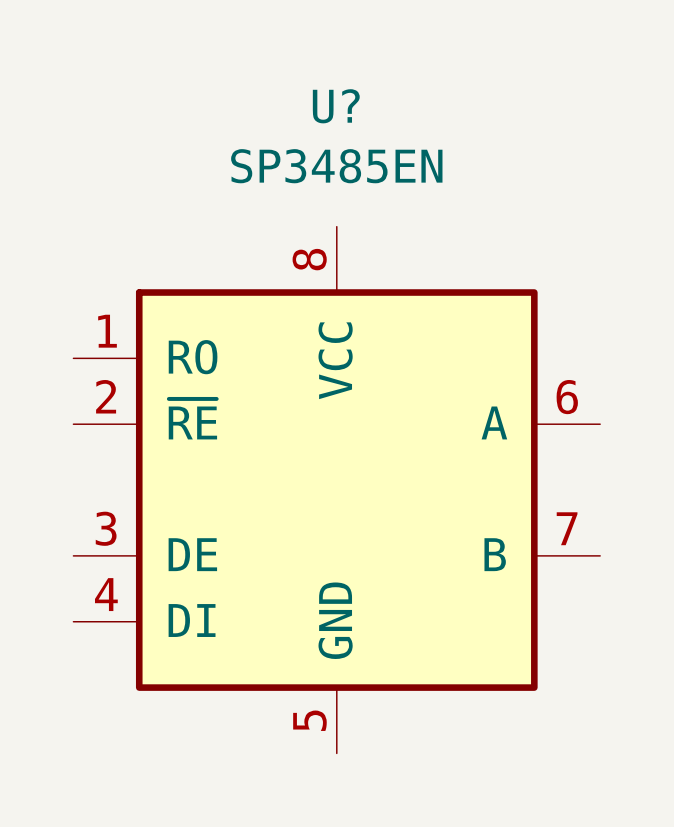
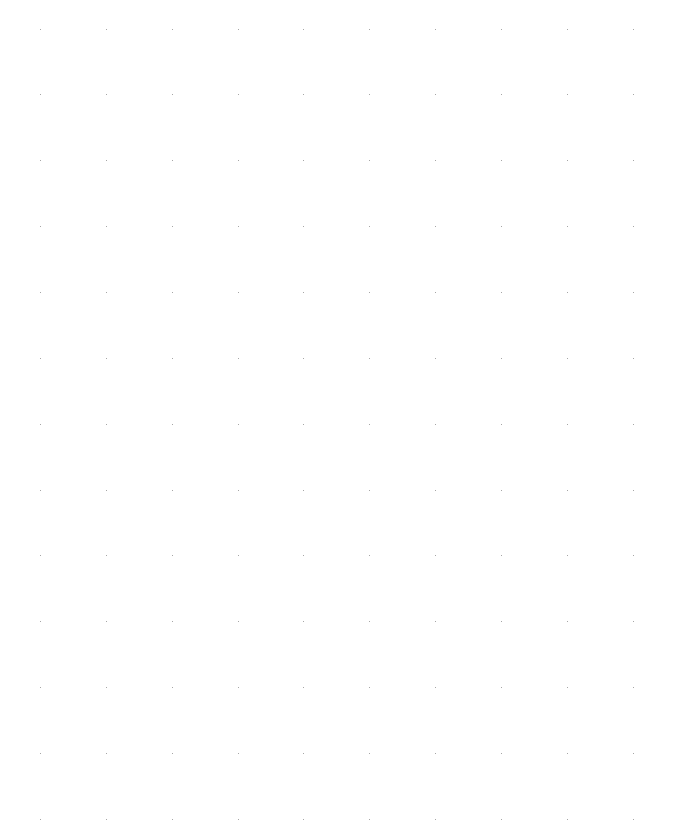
U?: SP3485EN (336, 490) -> none

